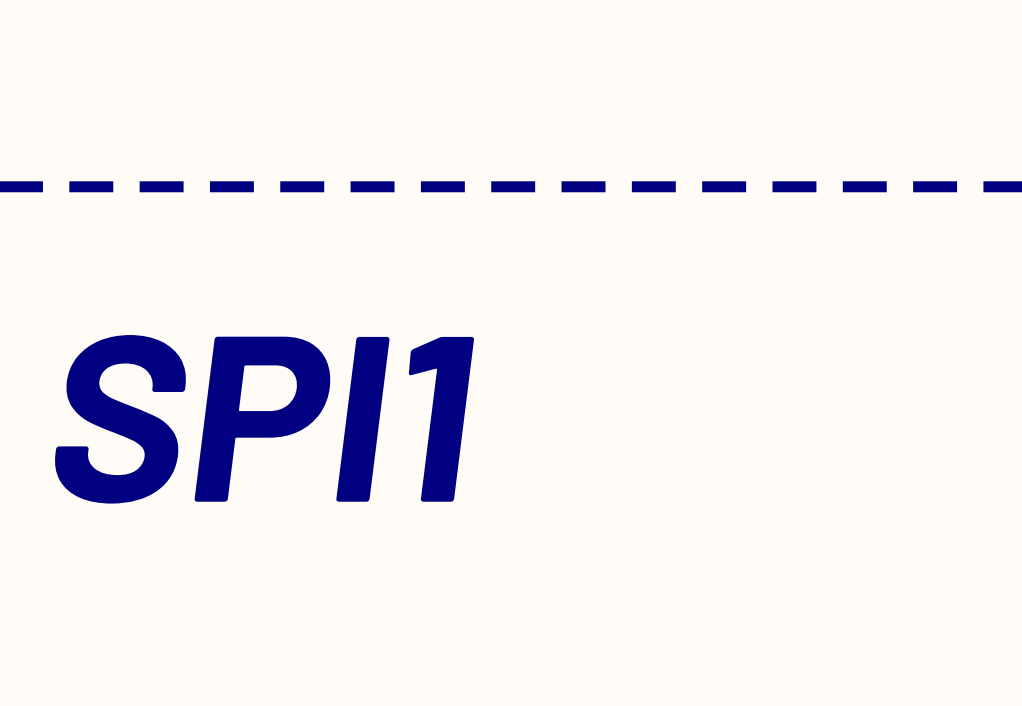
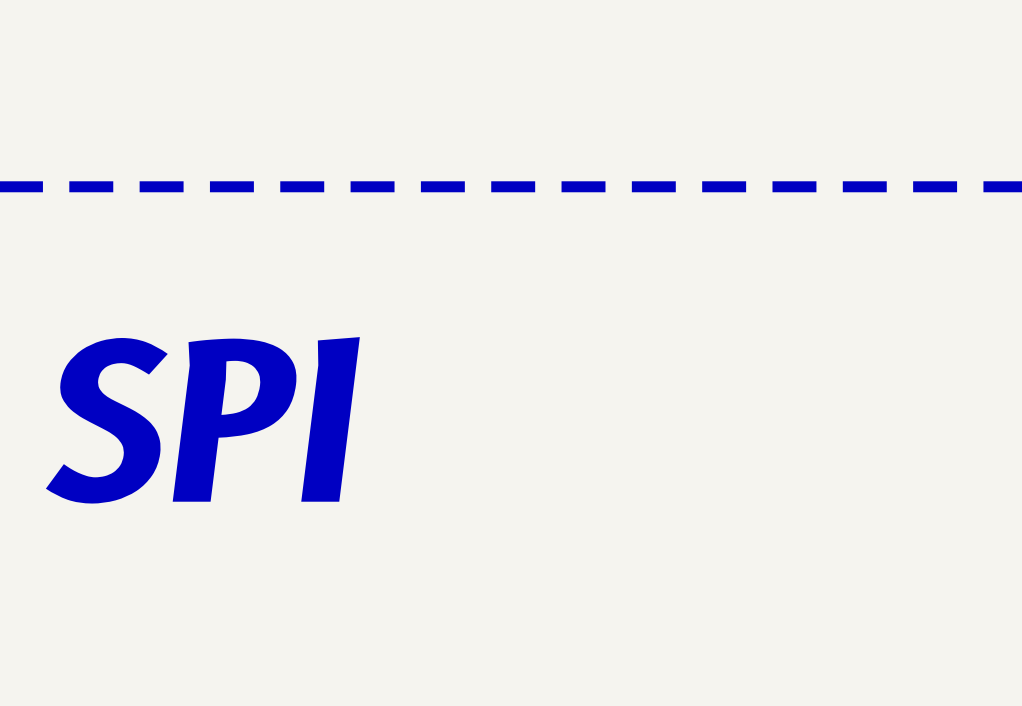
text: SPI1 (263, 419) -> SPI (202, 420)

